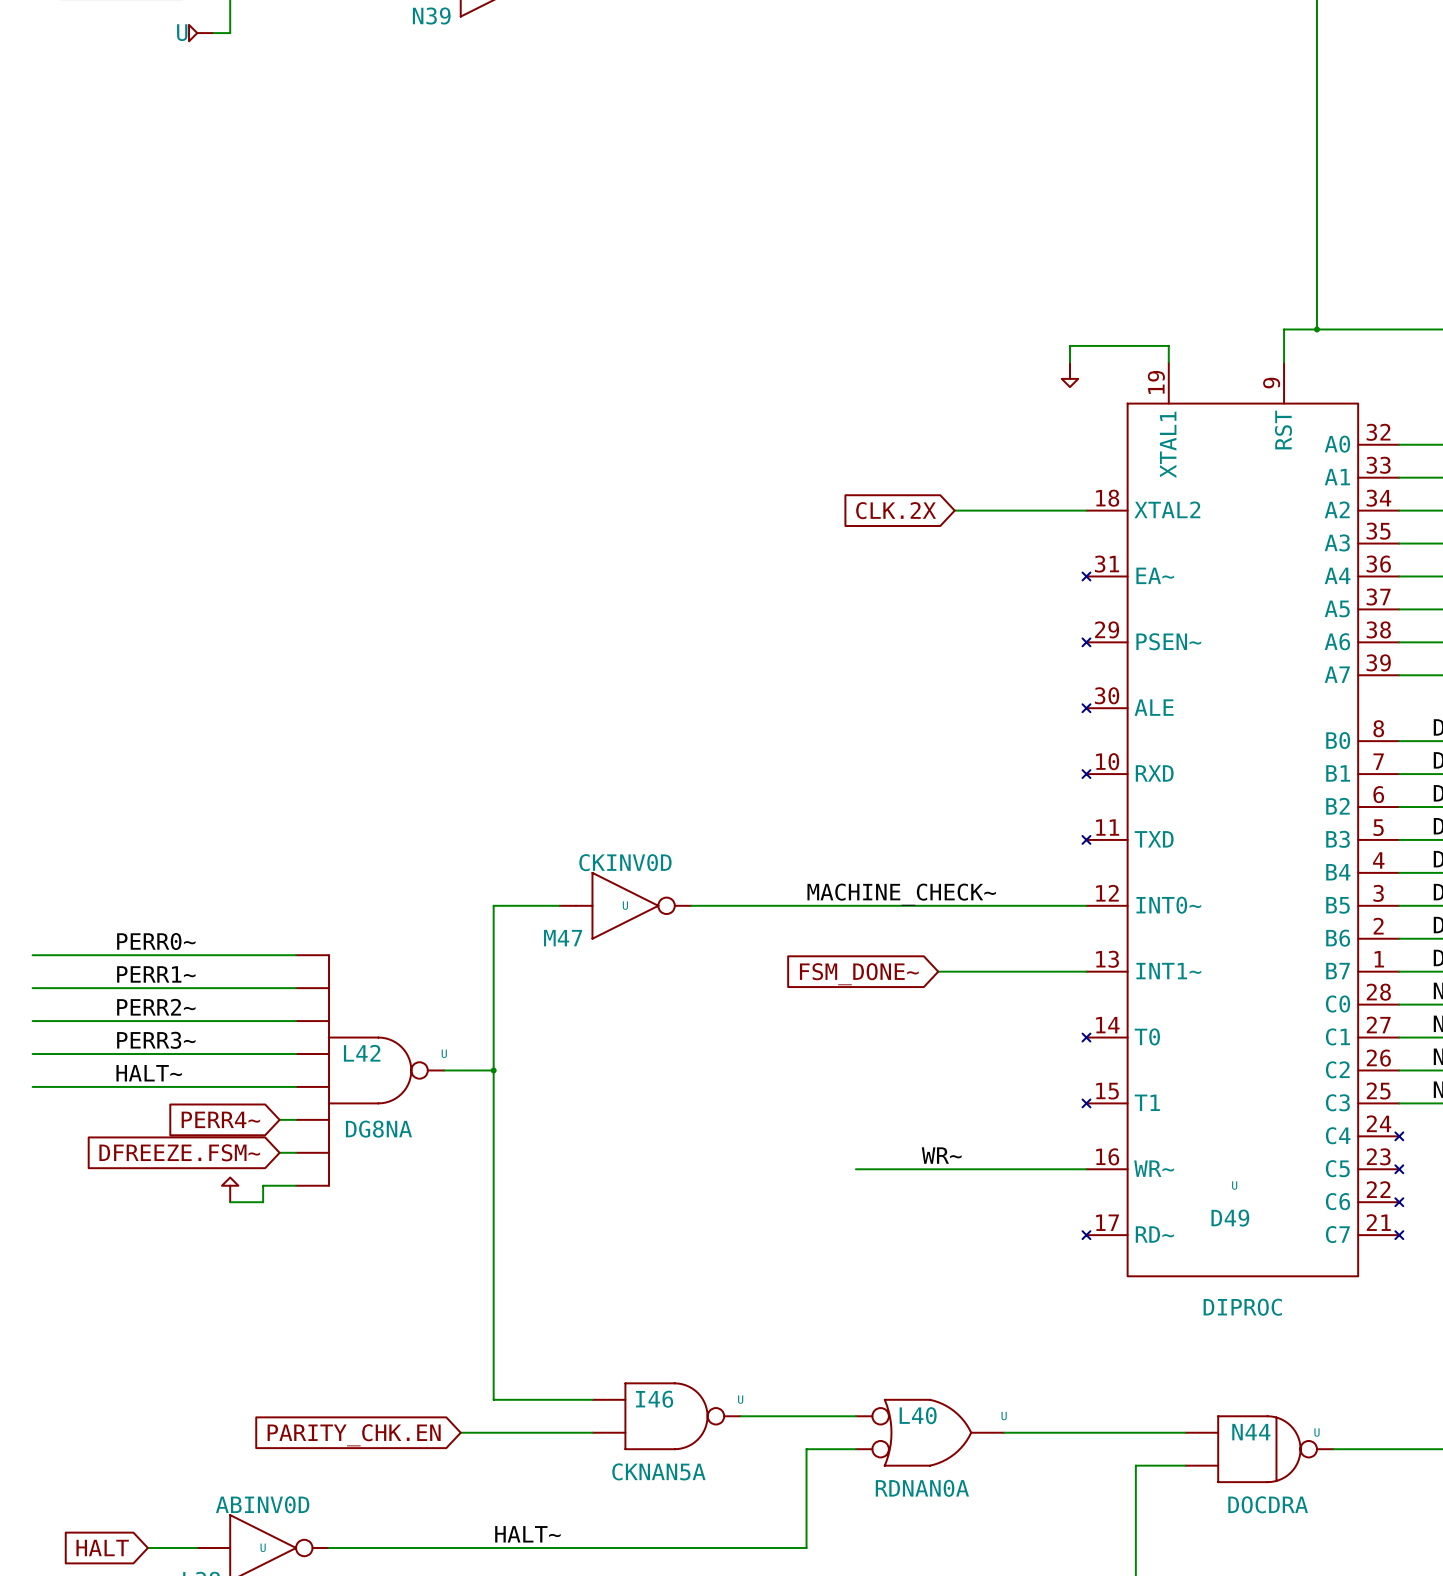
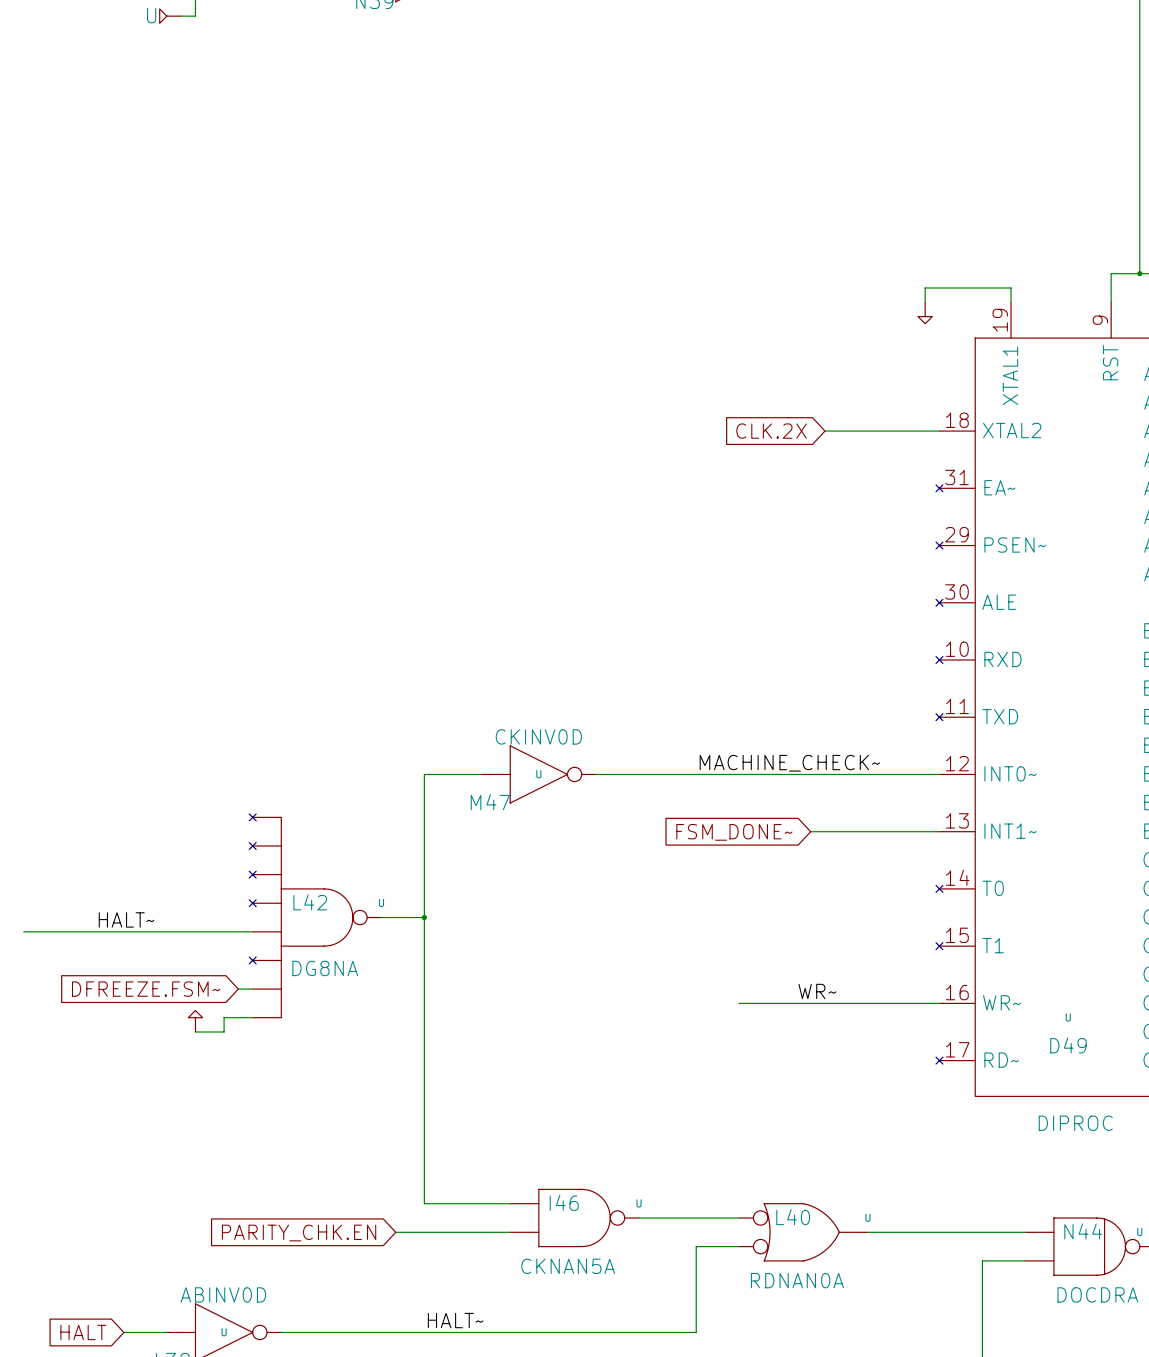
label: PERR0~ (156, 941) -> none
wire: (32, 955) (296, 955) -> none
no-connect mark: none -> (252, 817)
label: PERR1~ (156, 974) -> none
wire: (32, 988) (296, 988) -> none
no-connect mark: none -> (252, 846)
label: PERR2~ (156, 1007) -> none
wire: (32, 1021) (296, 1021) -> none
no-connect mark: none -> (252, 874)
label: PERR3~ (156, 1040) -> none
wire: (32, 1054) (296, 1054) -> none
no-connect mark: none -> (252, 903)
global label: PERR4~ (220, 1119) -> none
wire: (279, 1119) (296, 1119) -> none
no-connect mark: none -> (252, 960)

